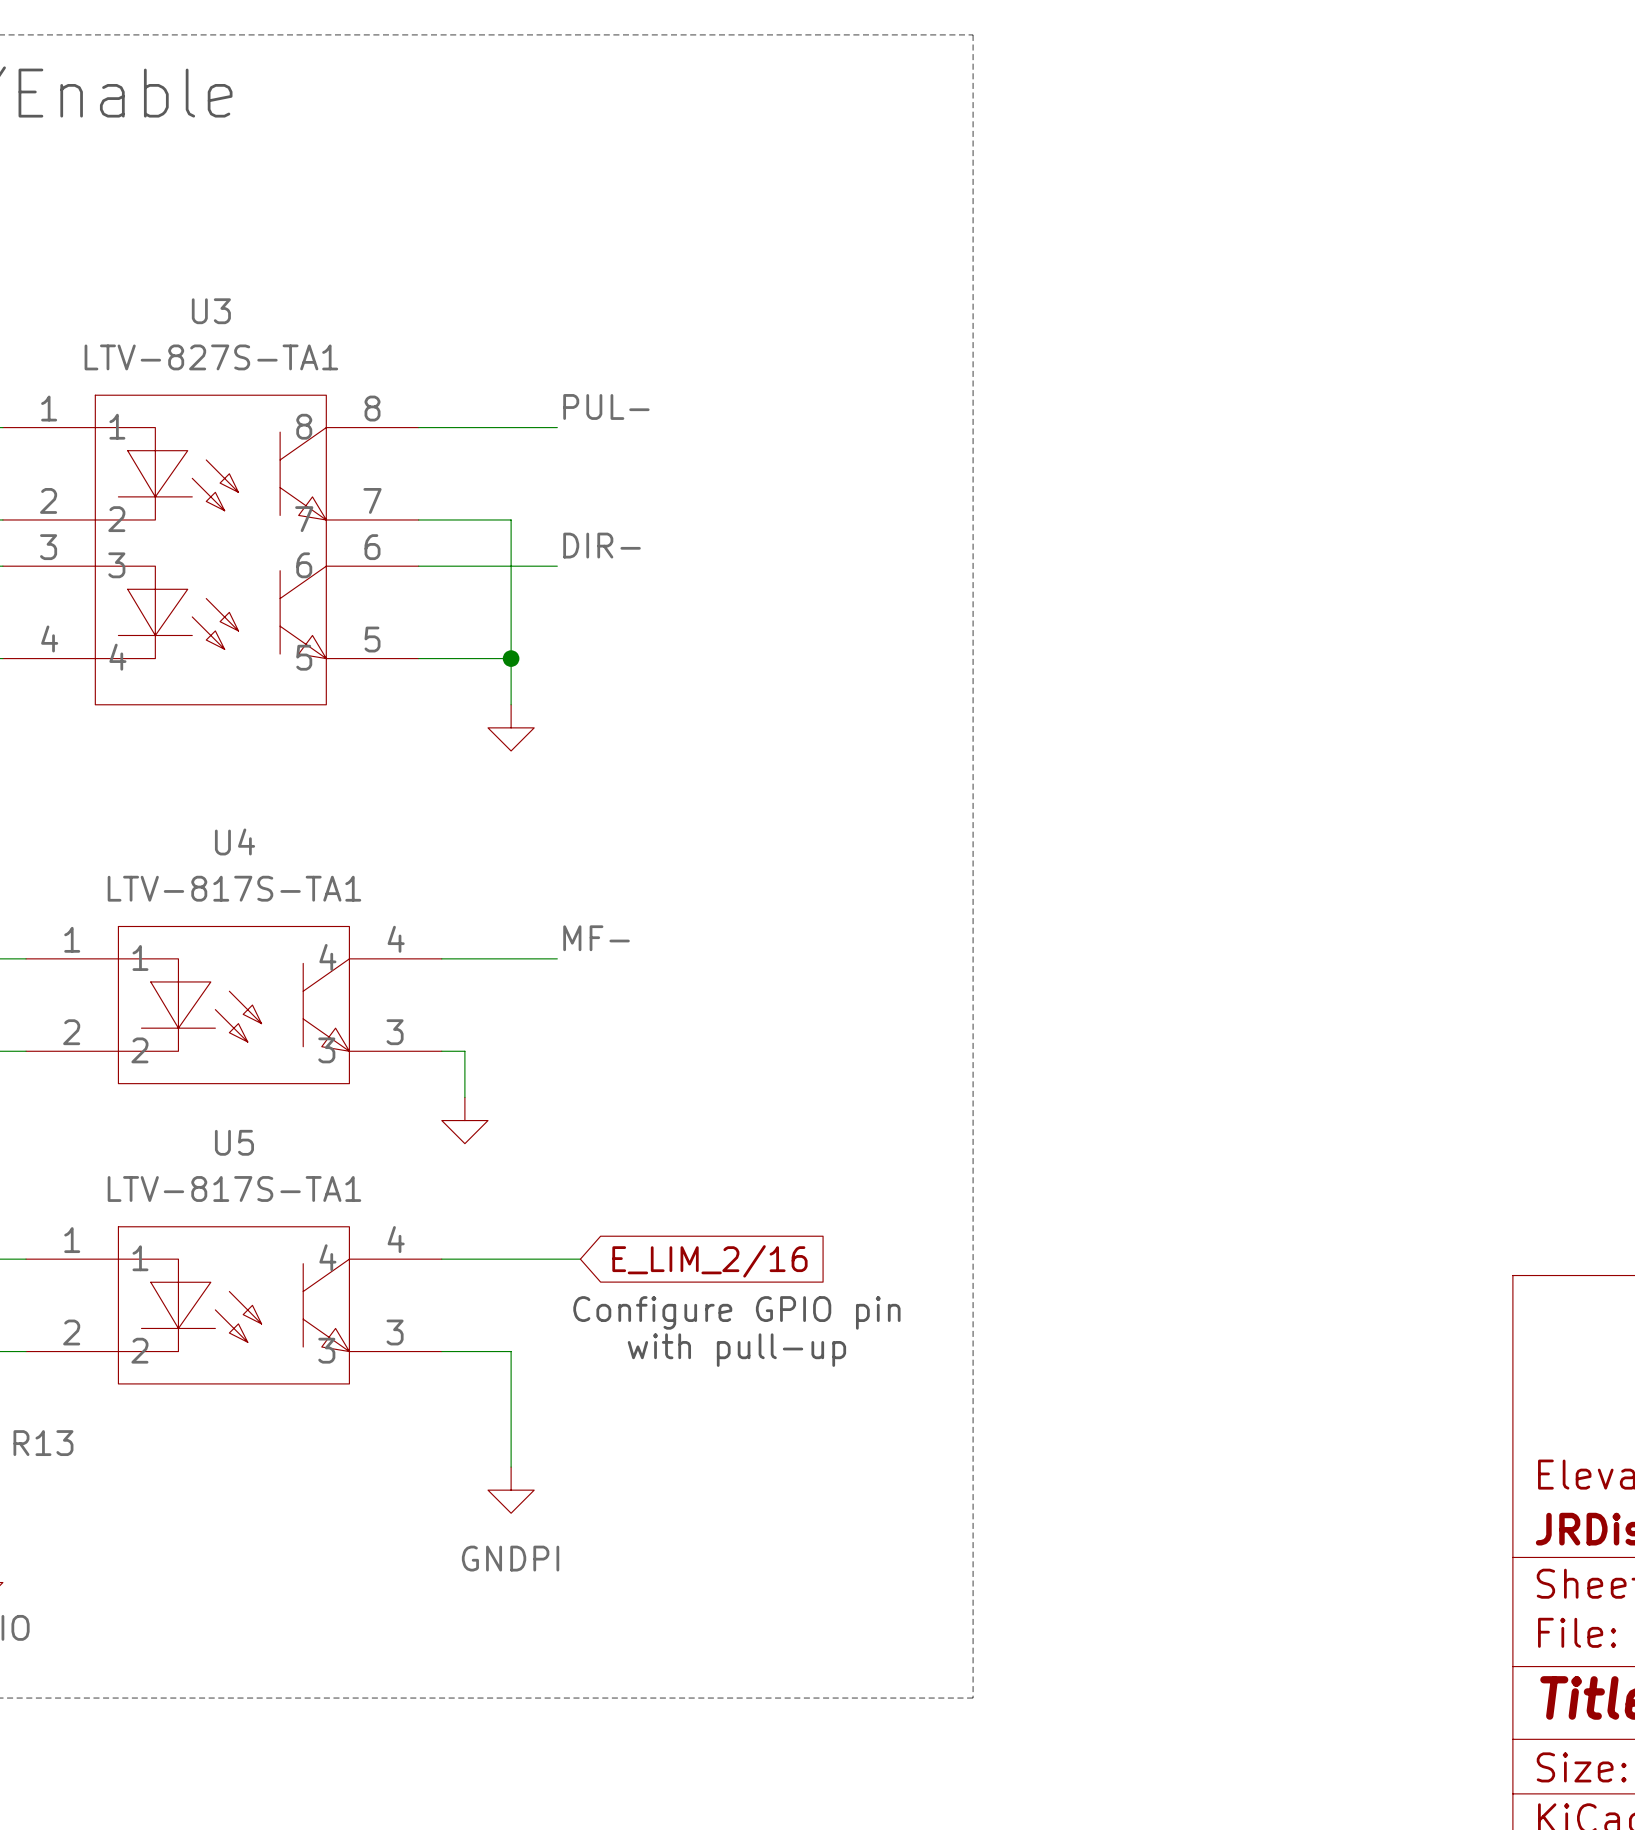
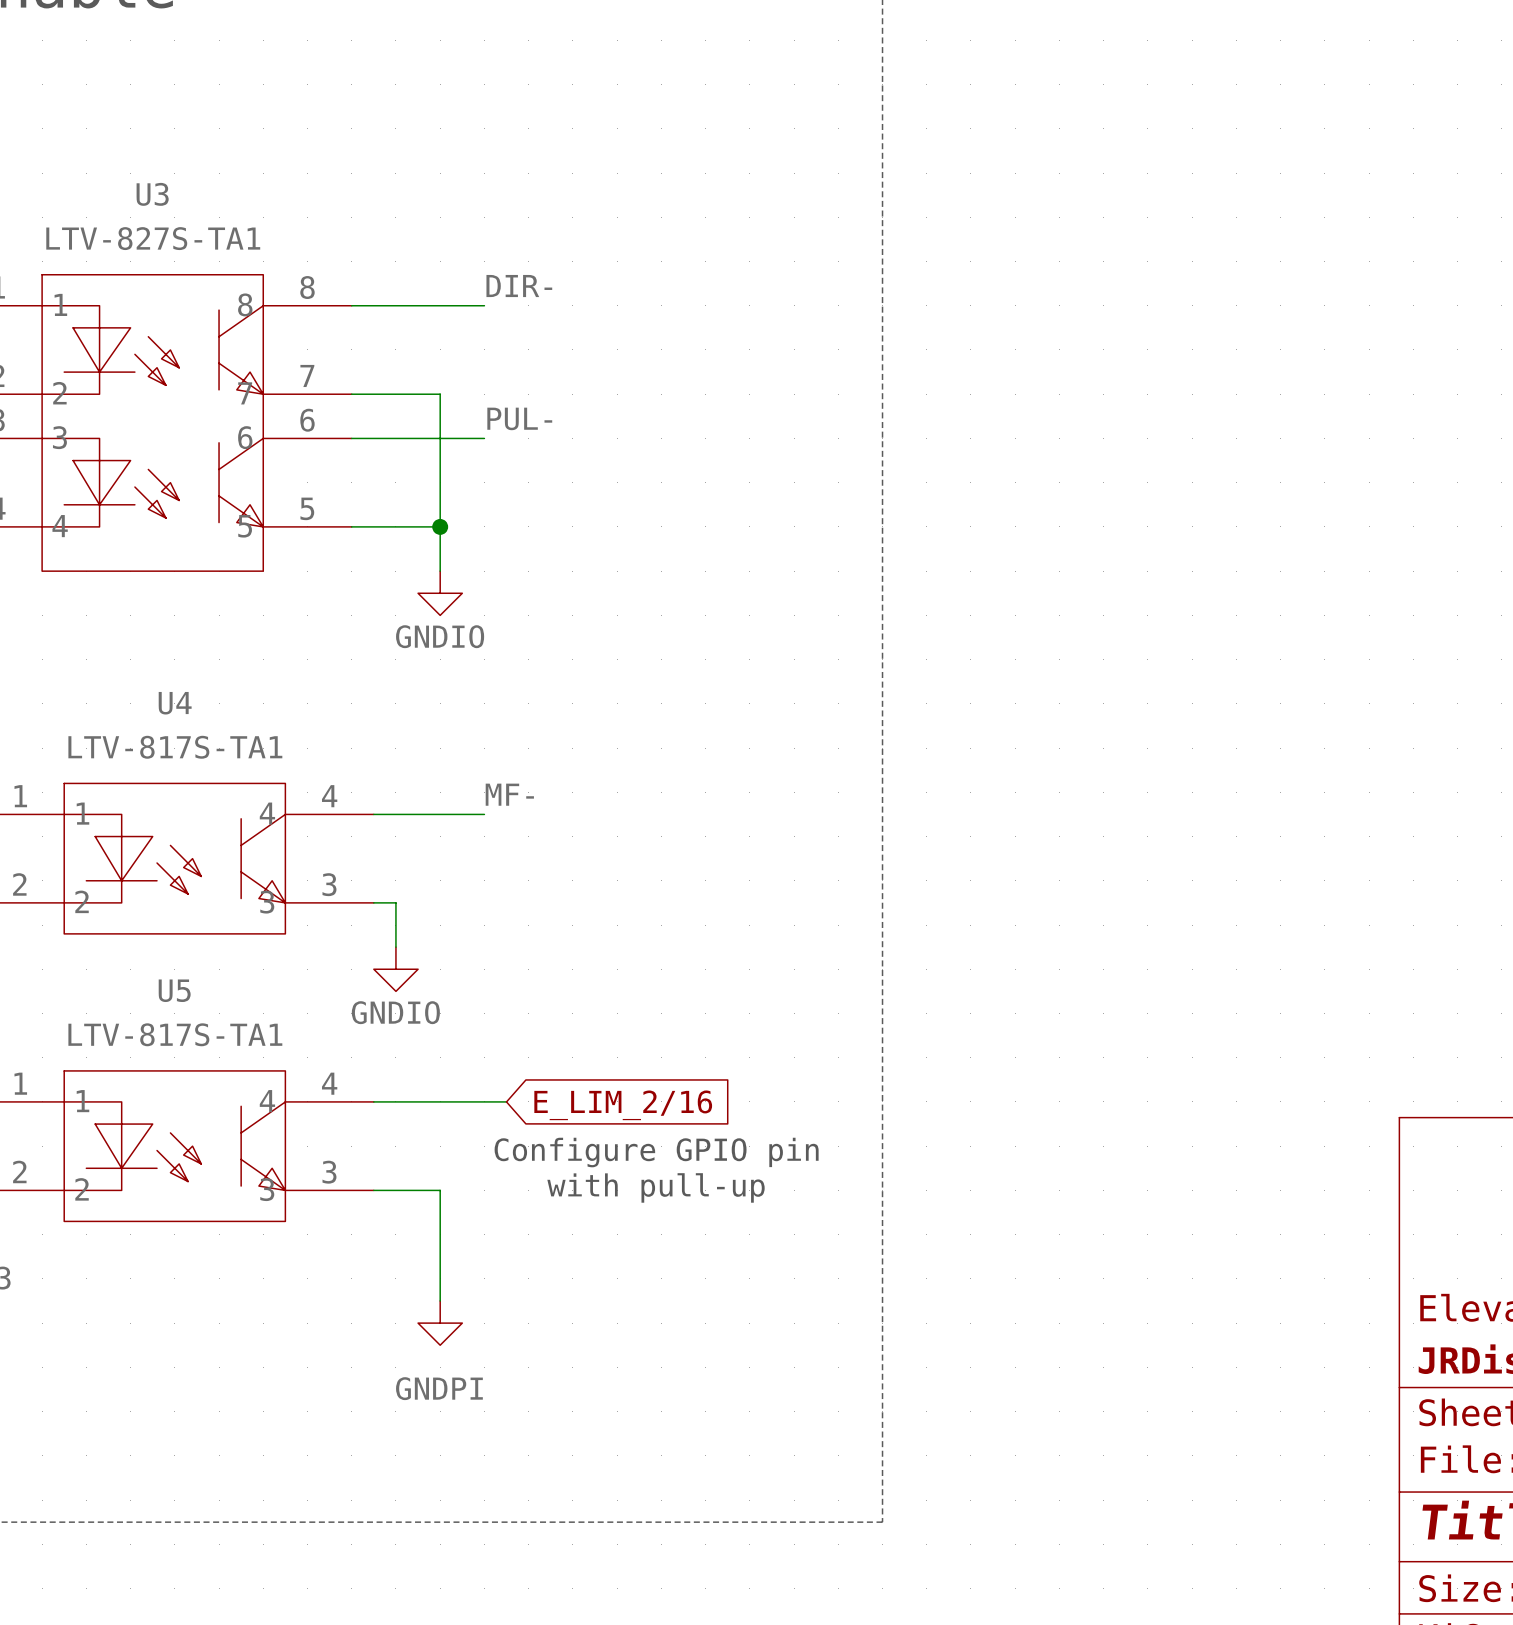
label: PUL- (606, 406) -> DIR- (519, 286)
label: DIR- (602, 545) -> PUL- (519, 418)
power symbol text: none -> GNDIO (440, 636)
power symbol text: none -> GNDIO (395, 1012)

